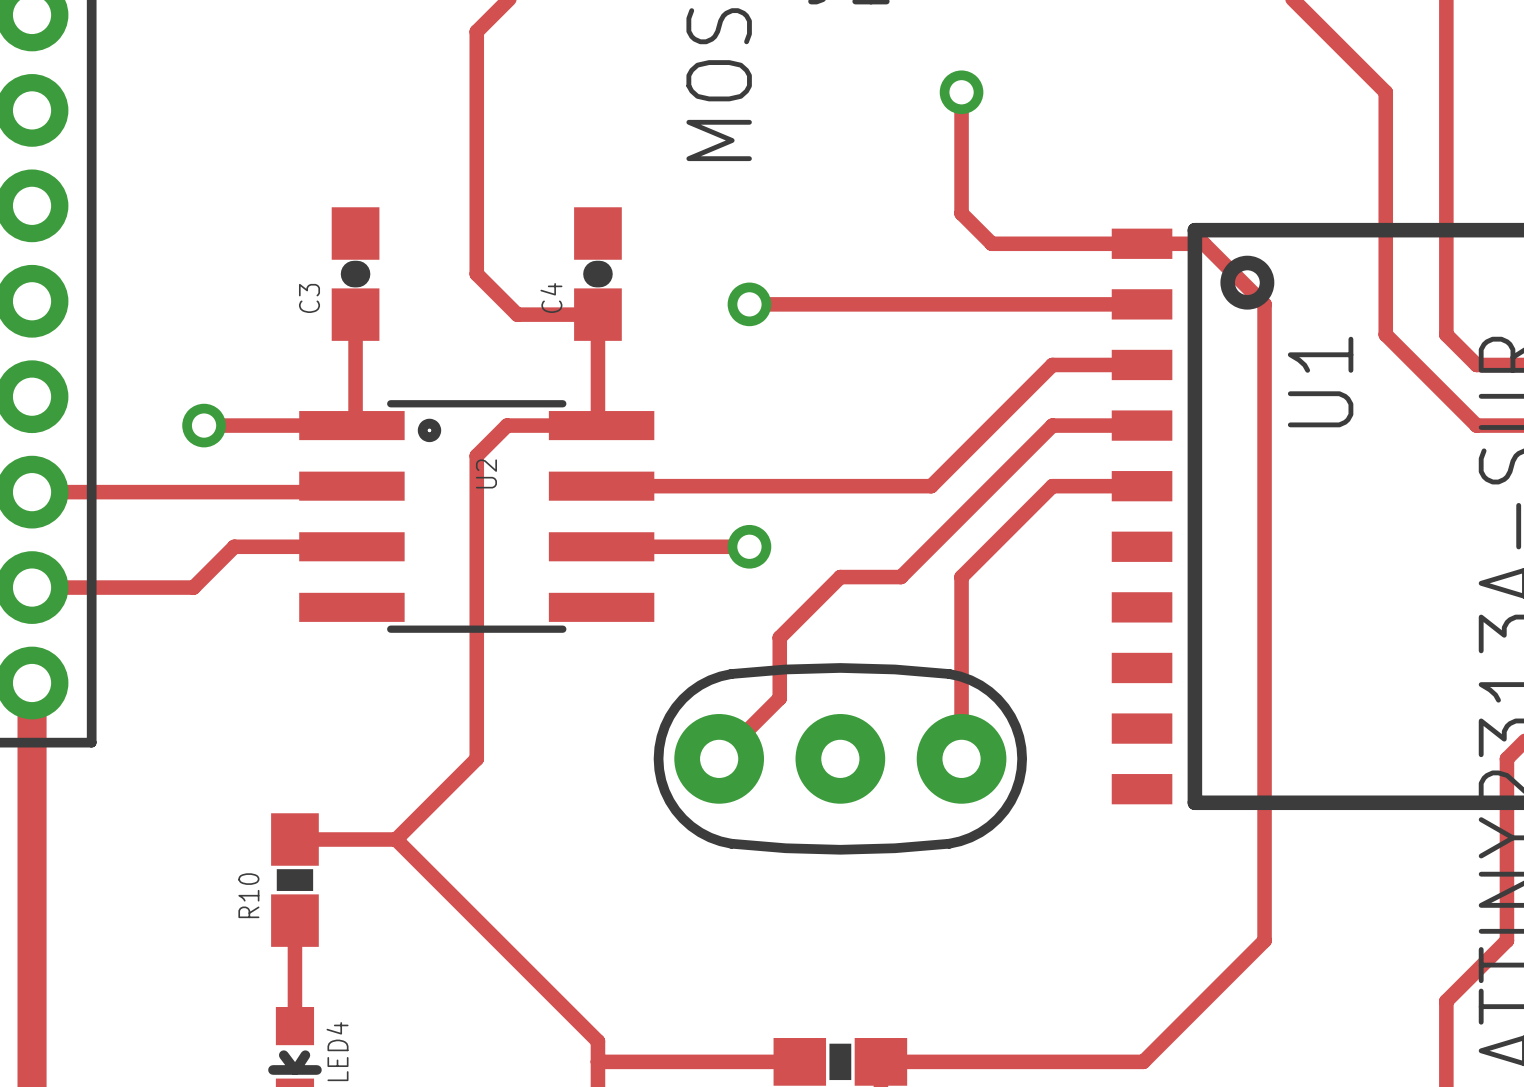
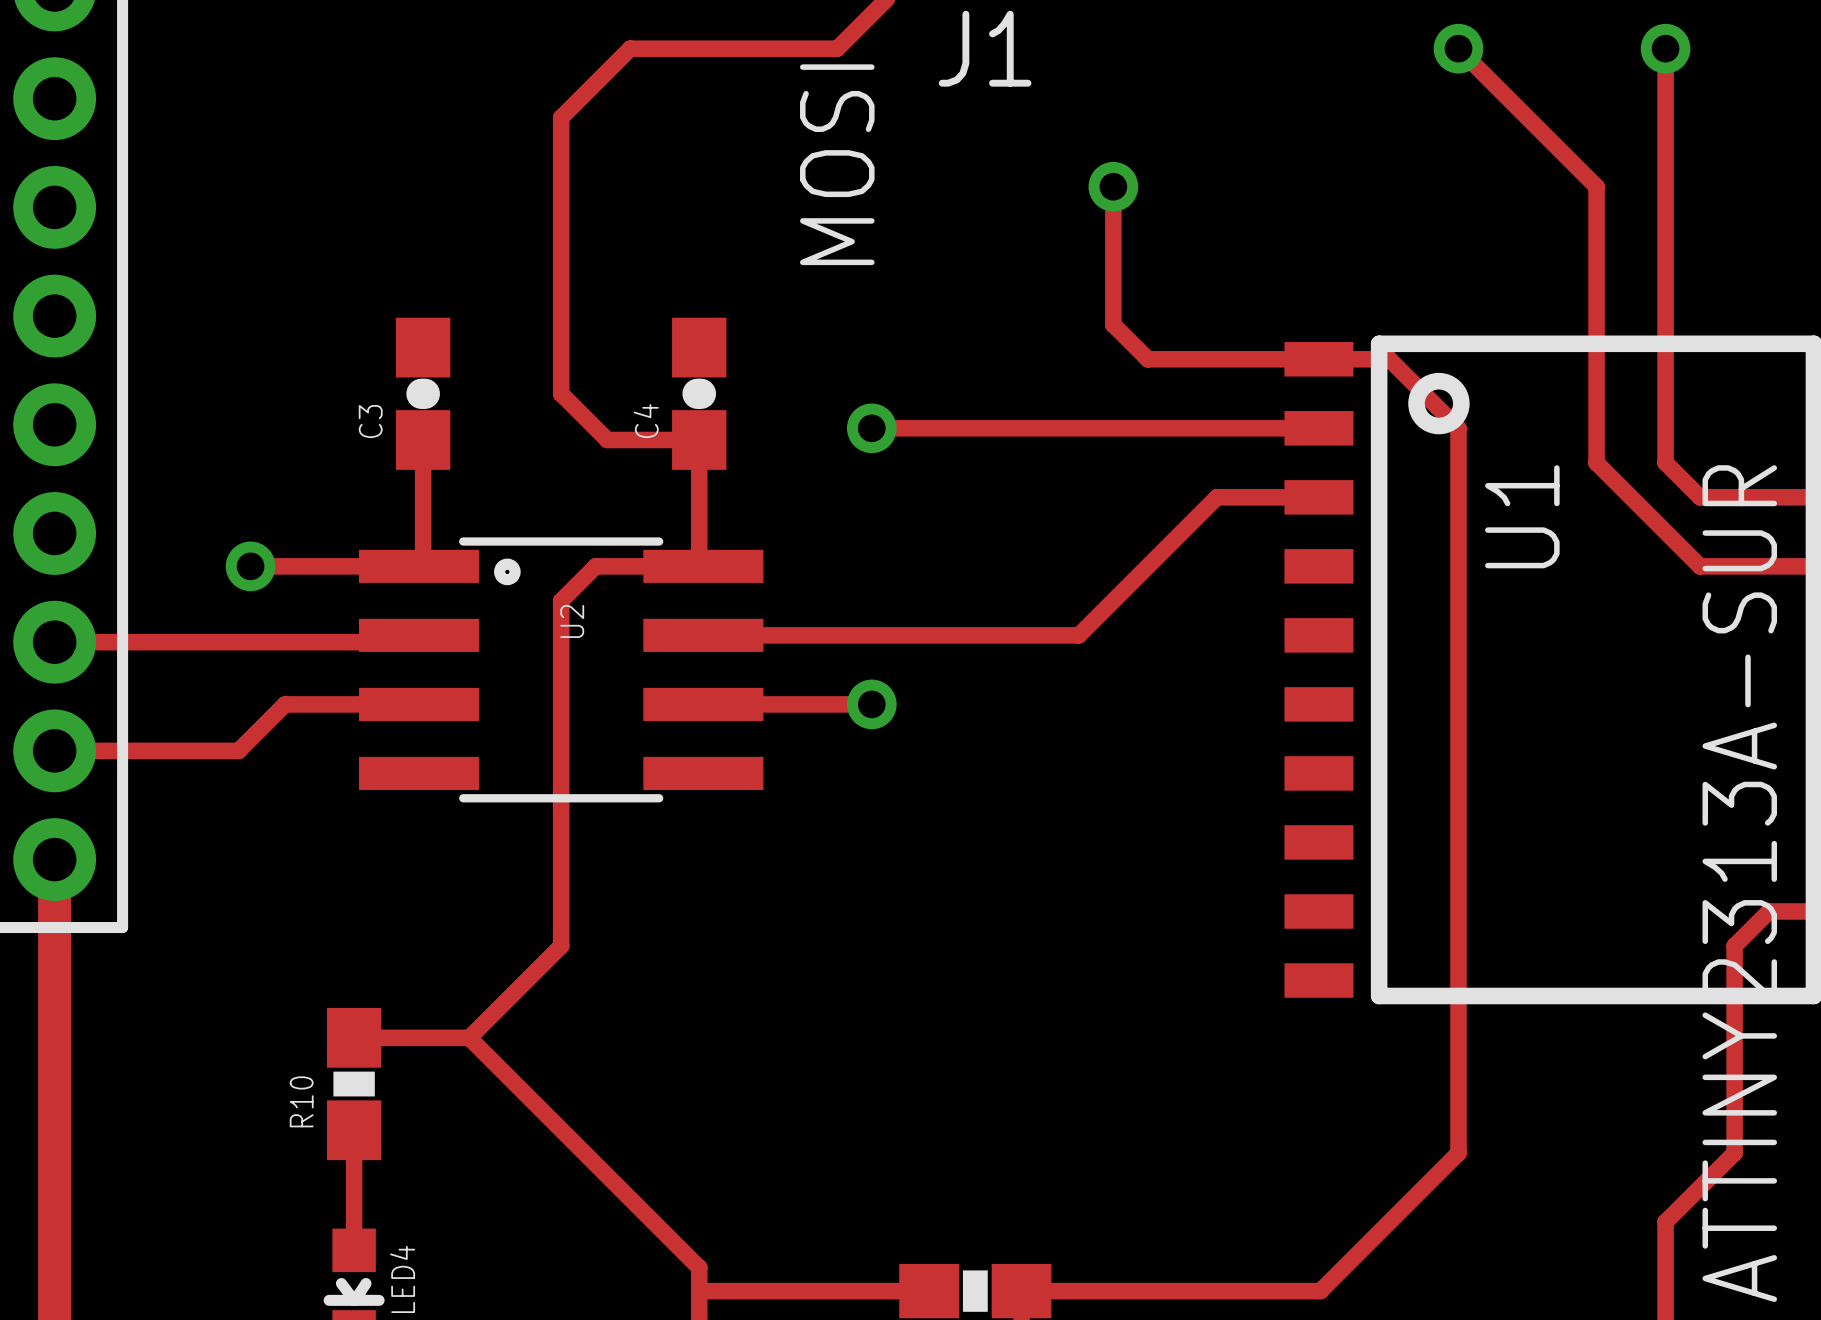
track: (1142, 425) (1052, 425) (900, 577) (840, 577) (779, 637) (779, 698) (719, 758) -> none
track: (1142, 486) (1052, 486) (961, 577) (961, 758) -> none
part: (840, 758) -> none

